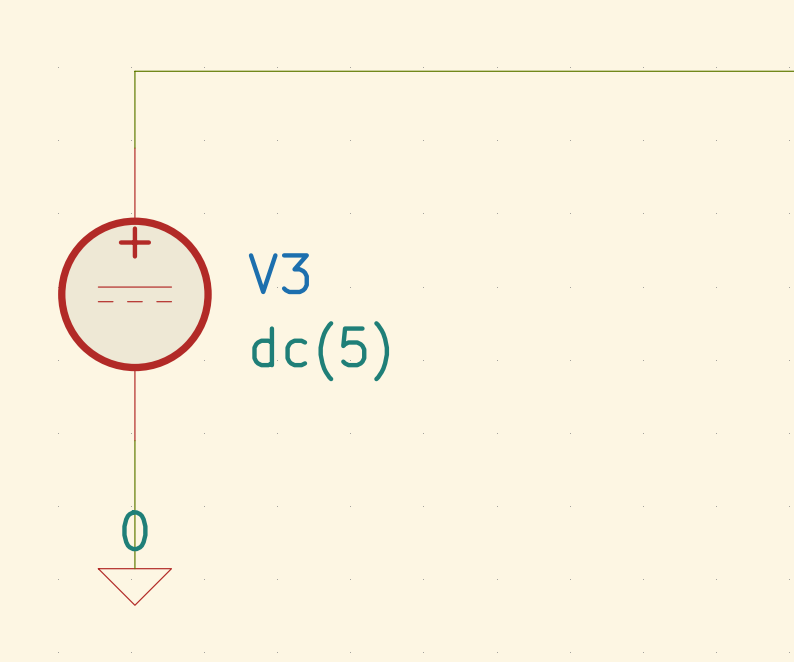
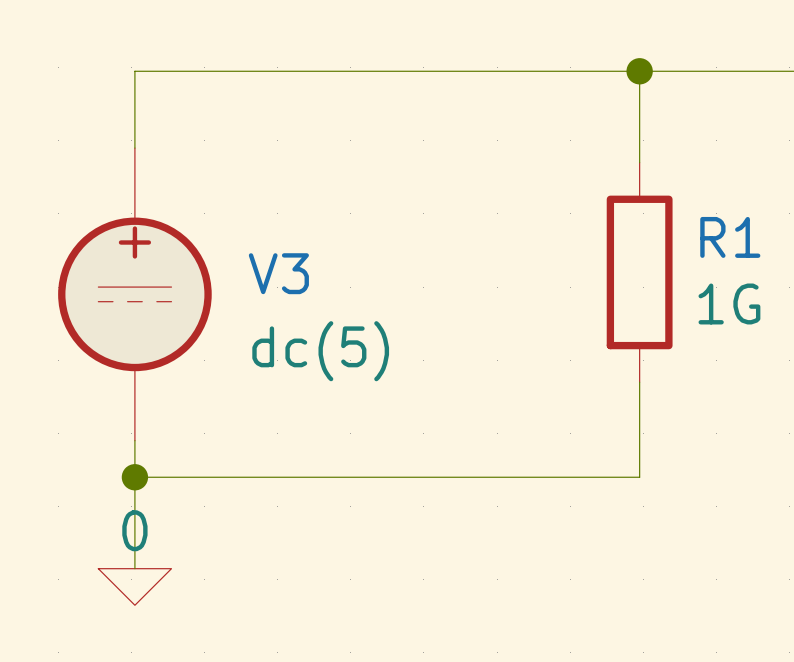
wire: none -> (639, 71) (639, 162)
junction: none -> (639, 71)
R1: none -> 1G (639, 272)
wire: none -> (639, 382) (639, 477) (134, 477)
junction: none -> (134, 477)

